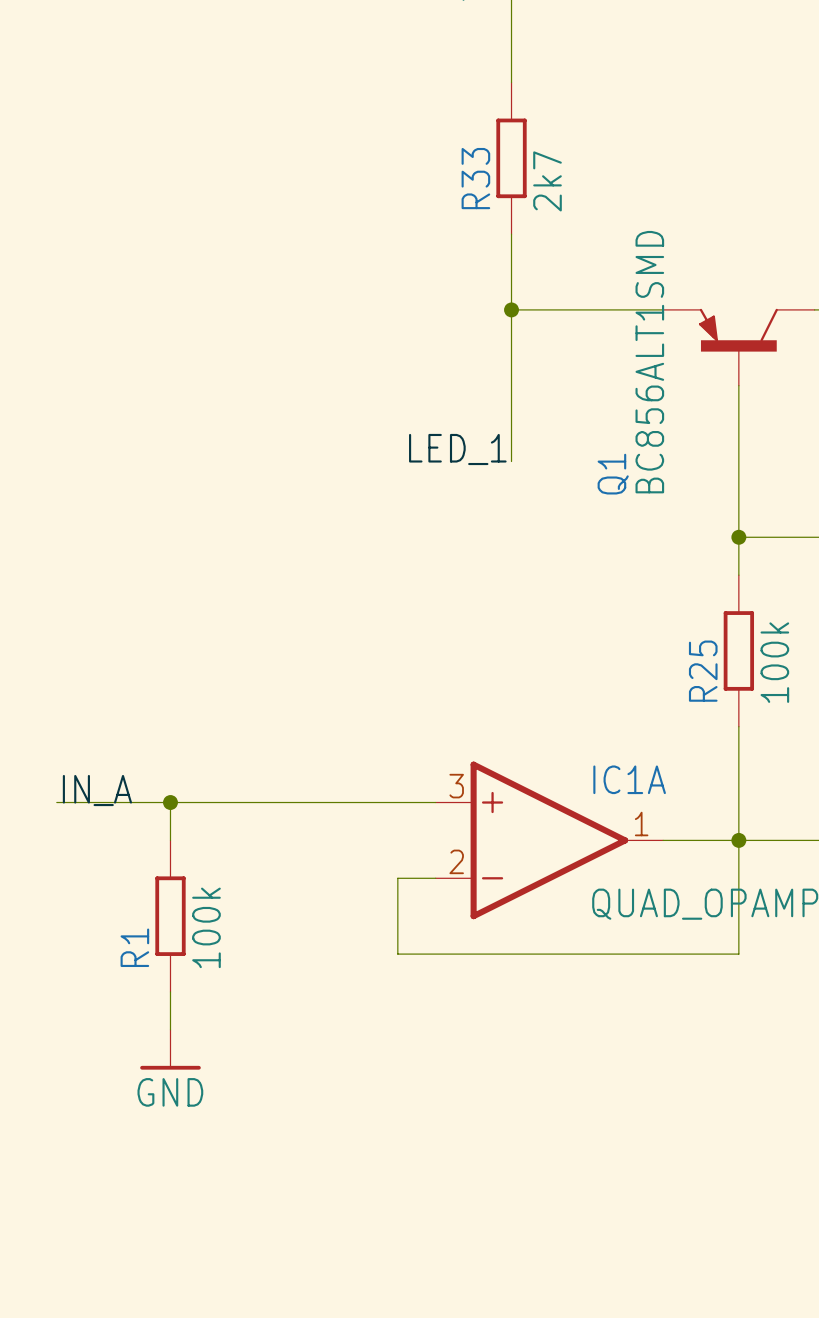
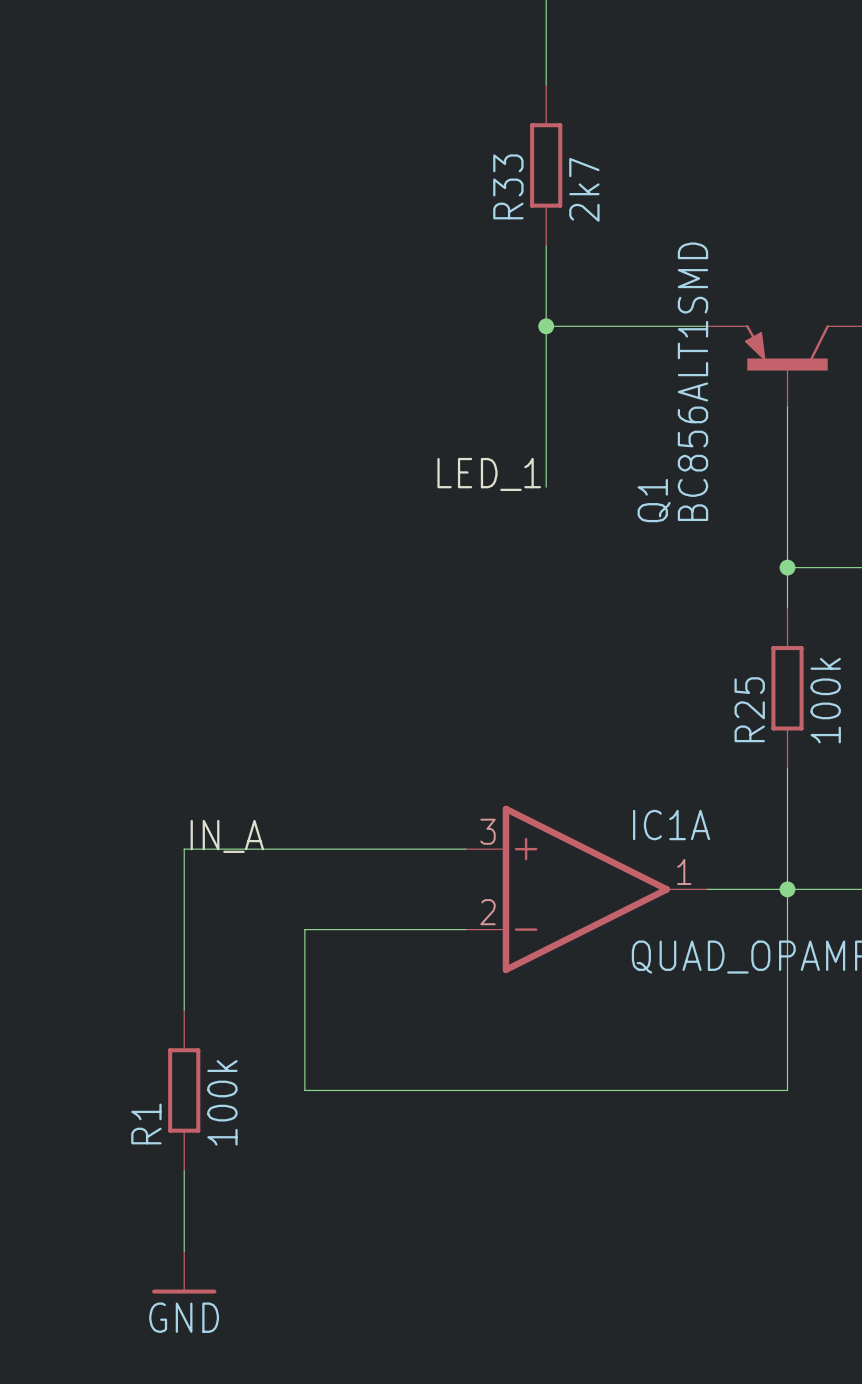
label position: IN_A (97, 790) -> IN_A (227, 836)
wire: (56, 802) (170, 802) -> none
junction: (170, 802) -> none
wire: none -> (184, 889) (184, 1010)
wire: (397, 878) (397, 954) (738, 954) -> (425, 929) (304, 929) (304, 1090) (787, 1090) (787, 1010)
R1 position: (170, 916) -> (184, 1090)
wire: (170, 991) (170, 1029) -> none
power symbol position: GND (170, 1049) -> GND (184, 1272)
wire: none -> (184, 1170) (184, 1251)

